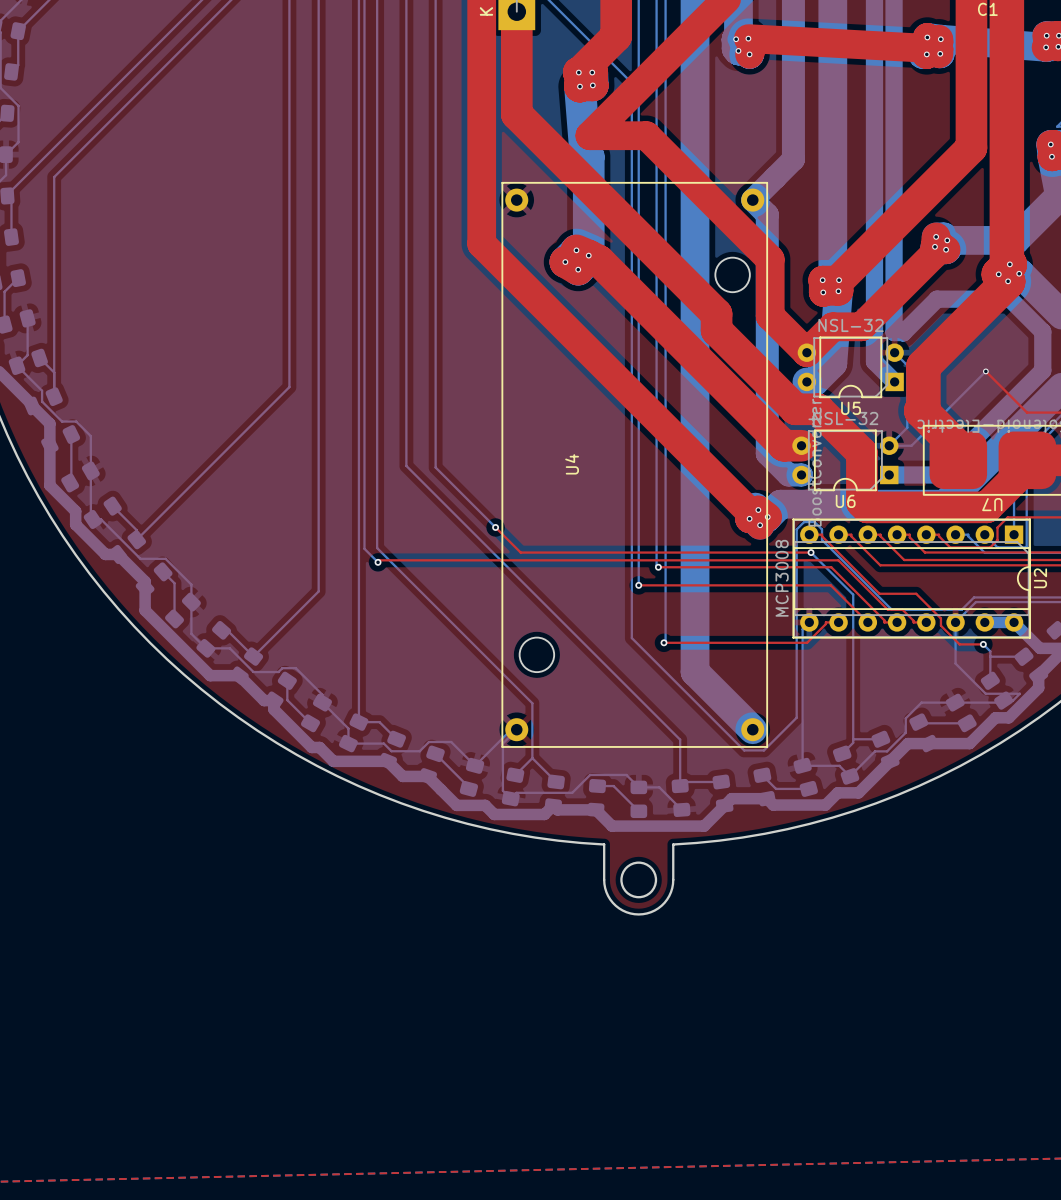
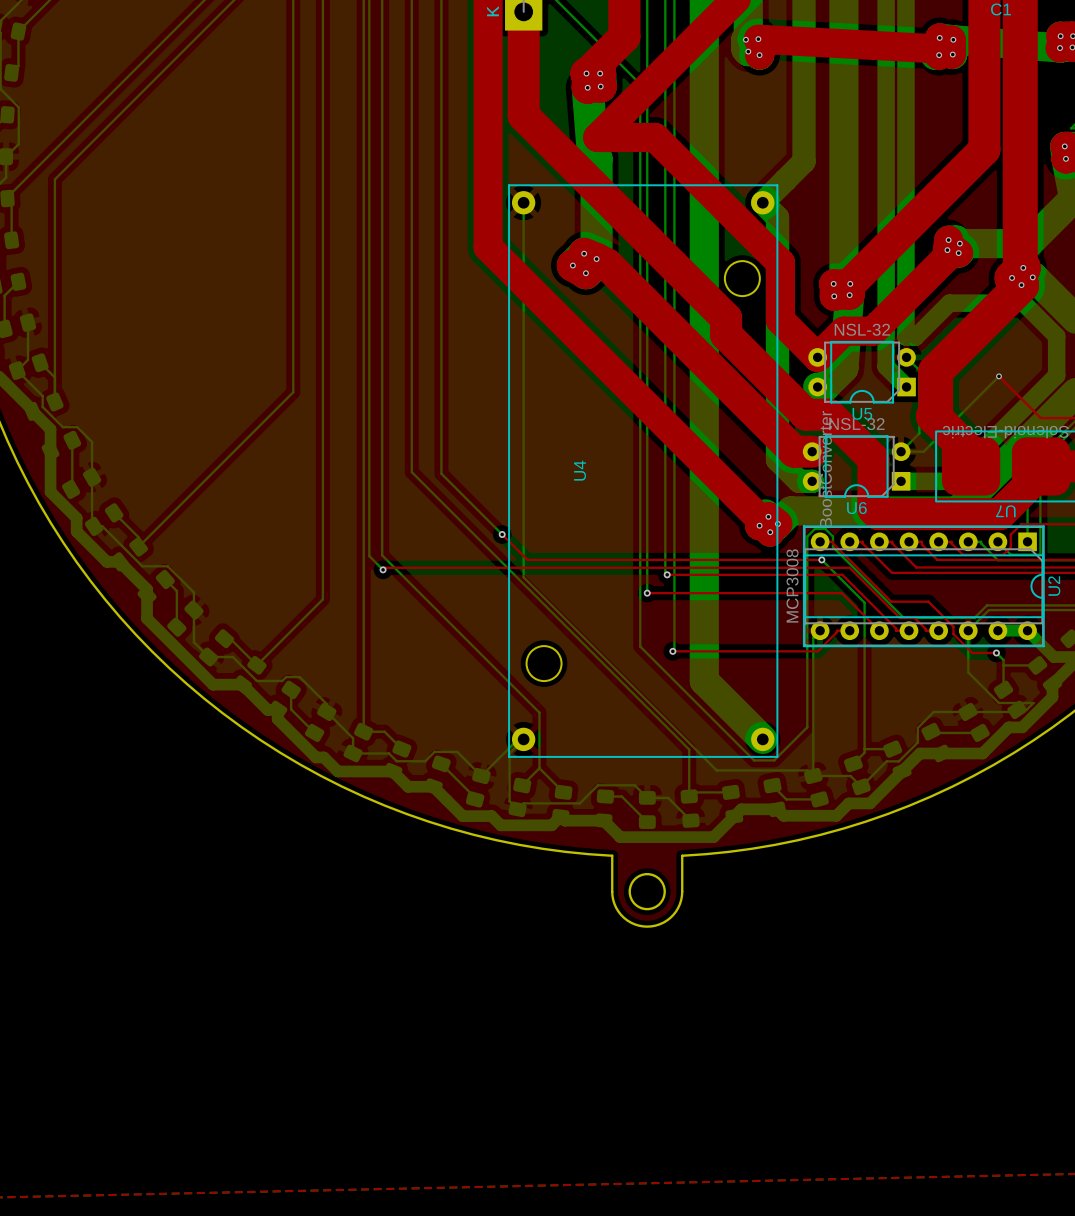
bottom track: none -> (523, 202) (523, 577) (716, 770) (807, 770) (813, 776)

